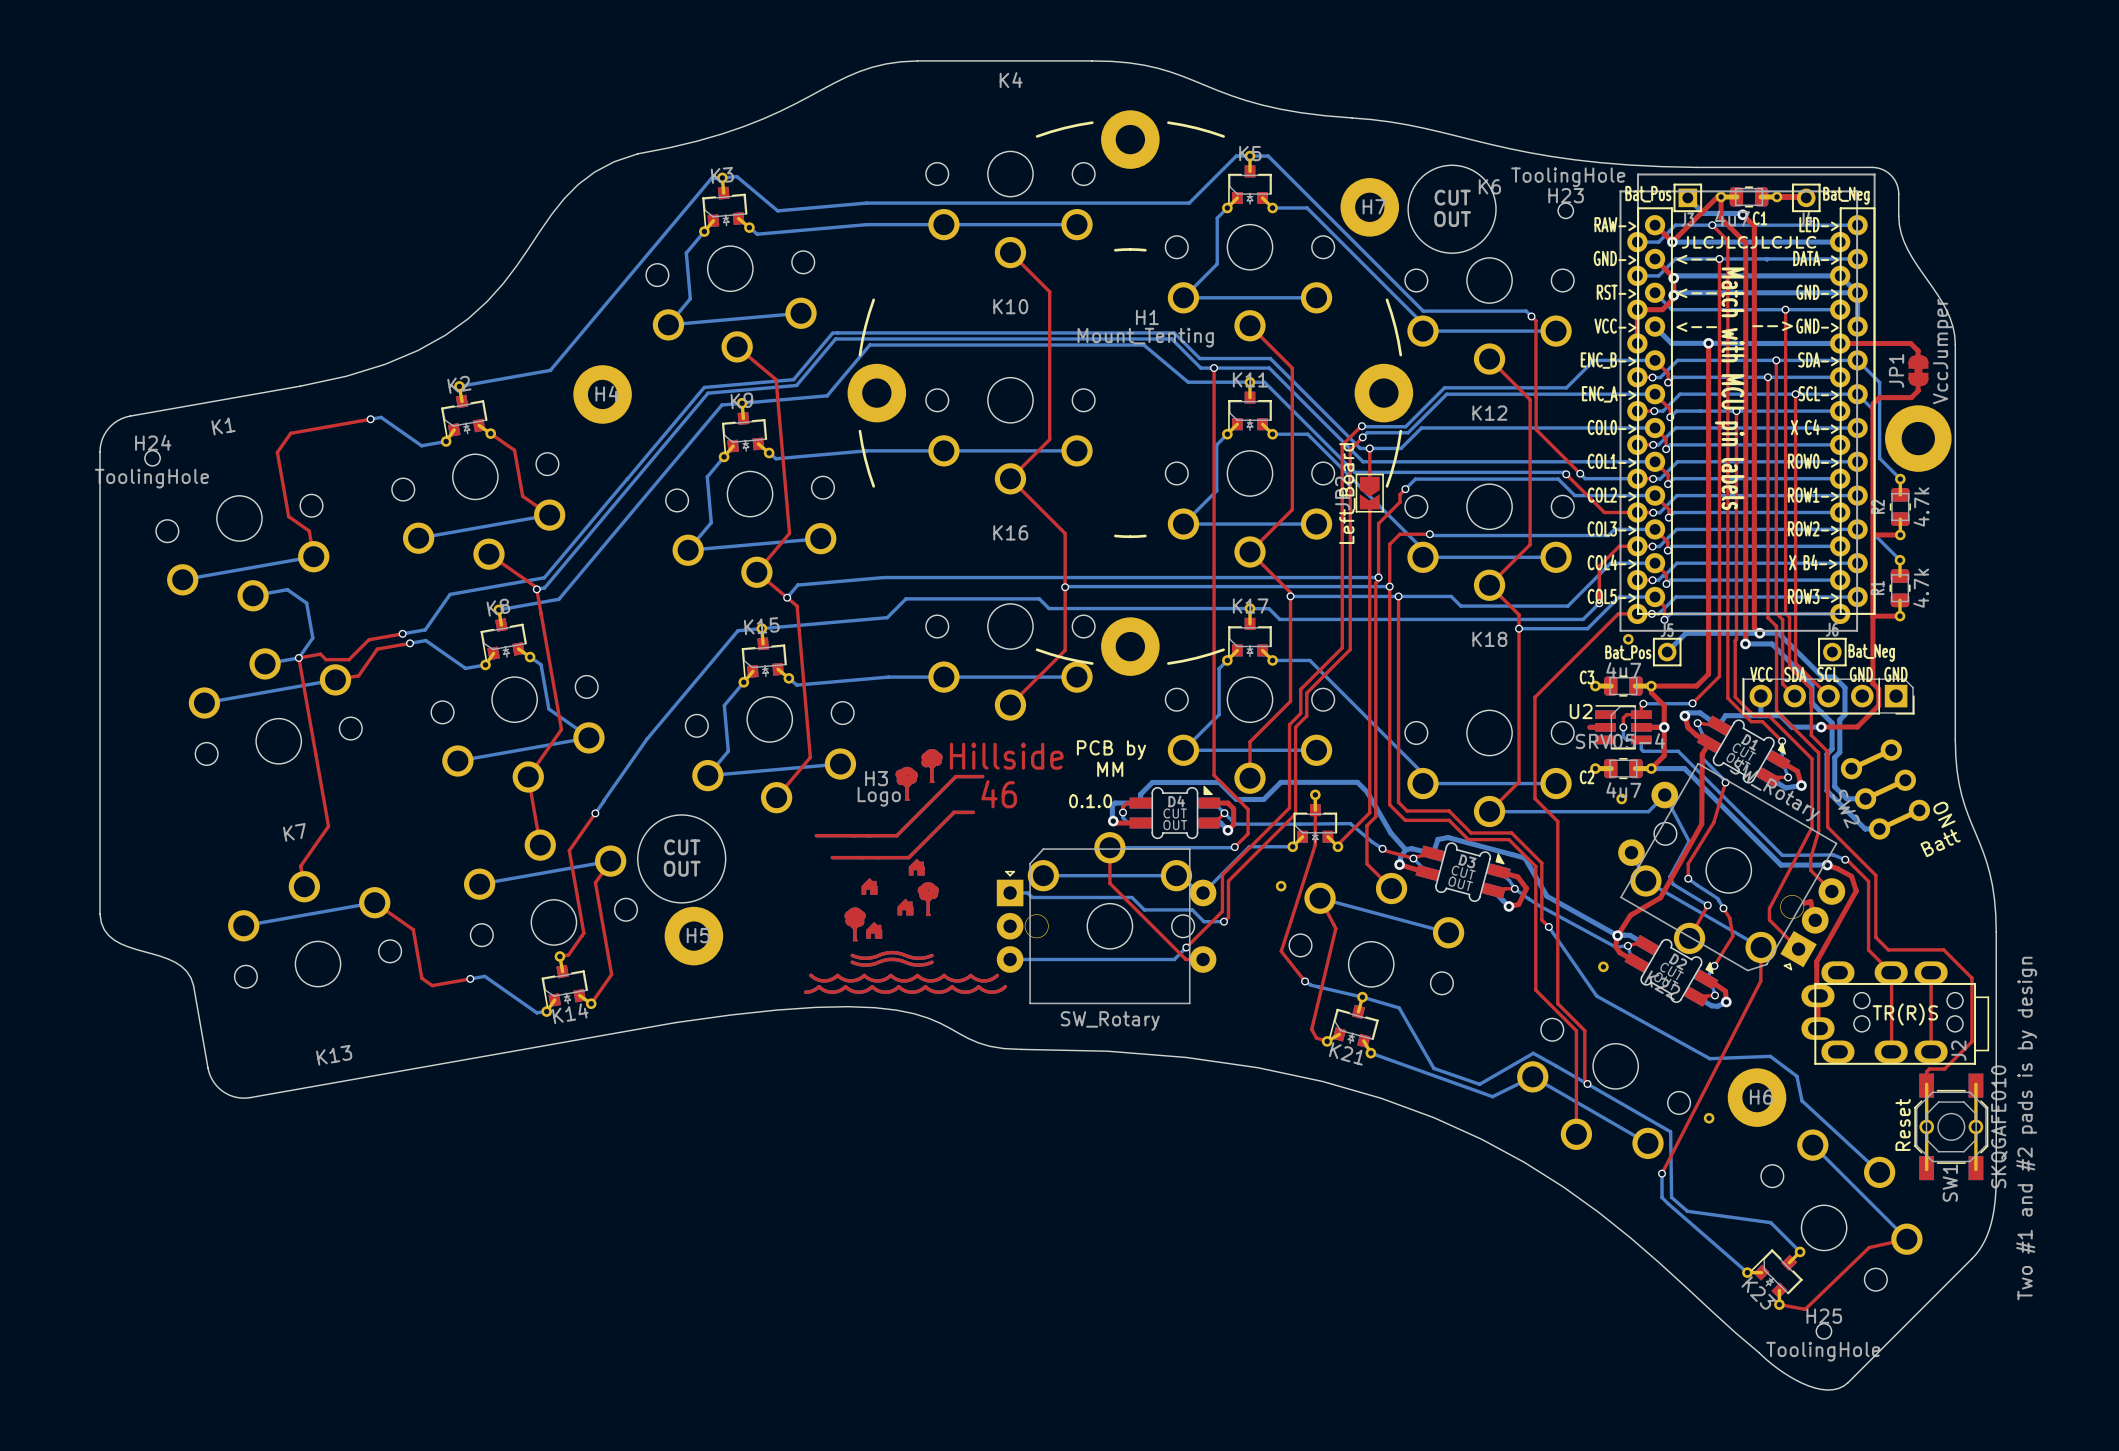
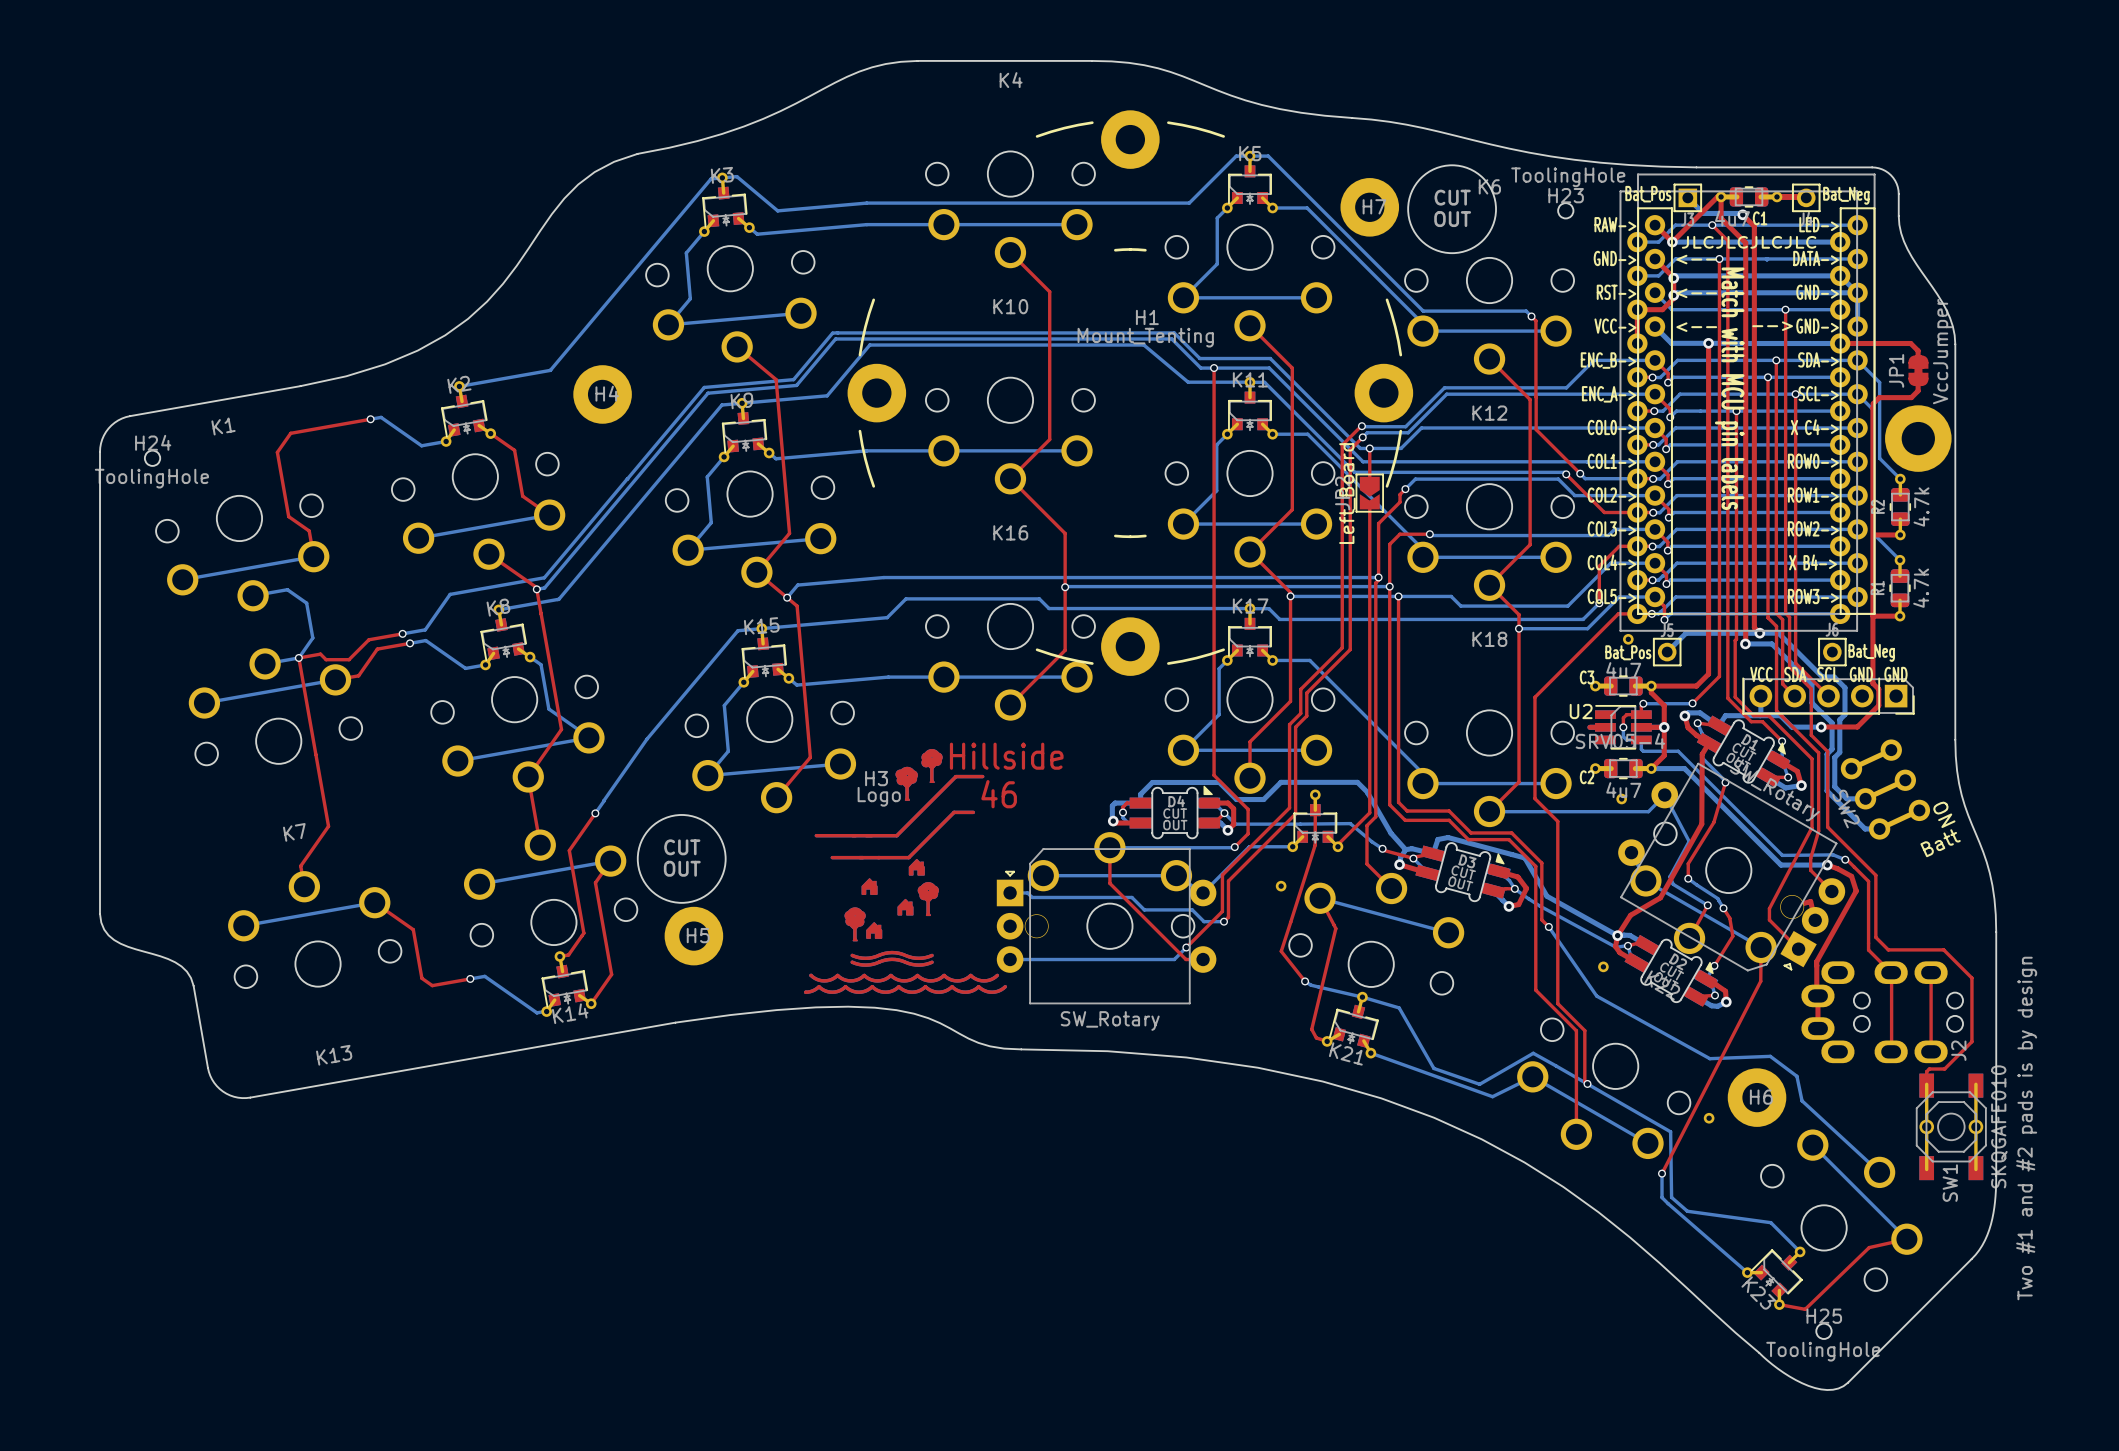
text: PCB by (1111, 750) -> none
text: MM (1110, 769) -> none
text: 0.1.0 (1090, 801) -> none
J2 footprint: [1801, 961, 1990, 1065] -> [1801, 961, 1964, 1064]
SW1 footprint: [1914, 1073, 1989, 1181] -> [1916, 1073, 1987, 1181]

